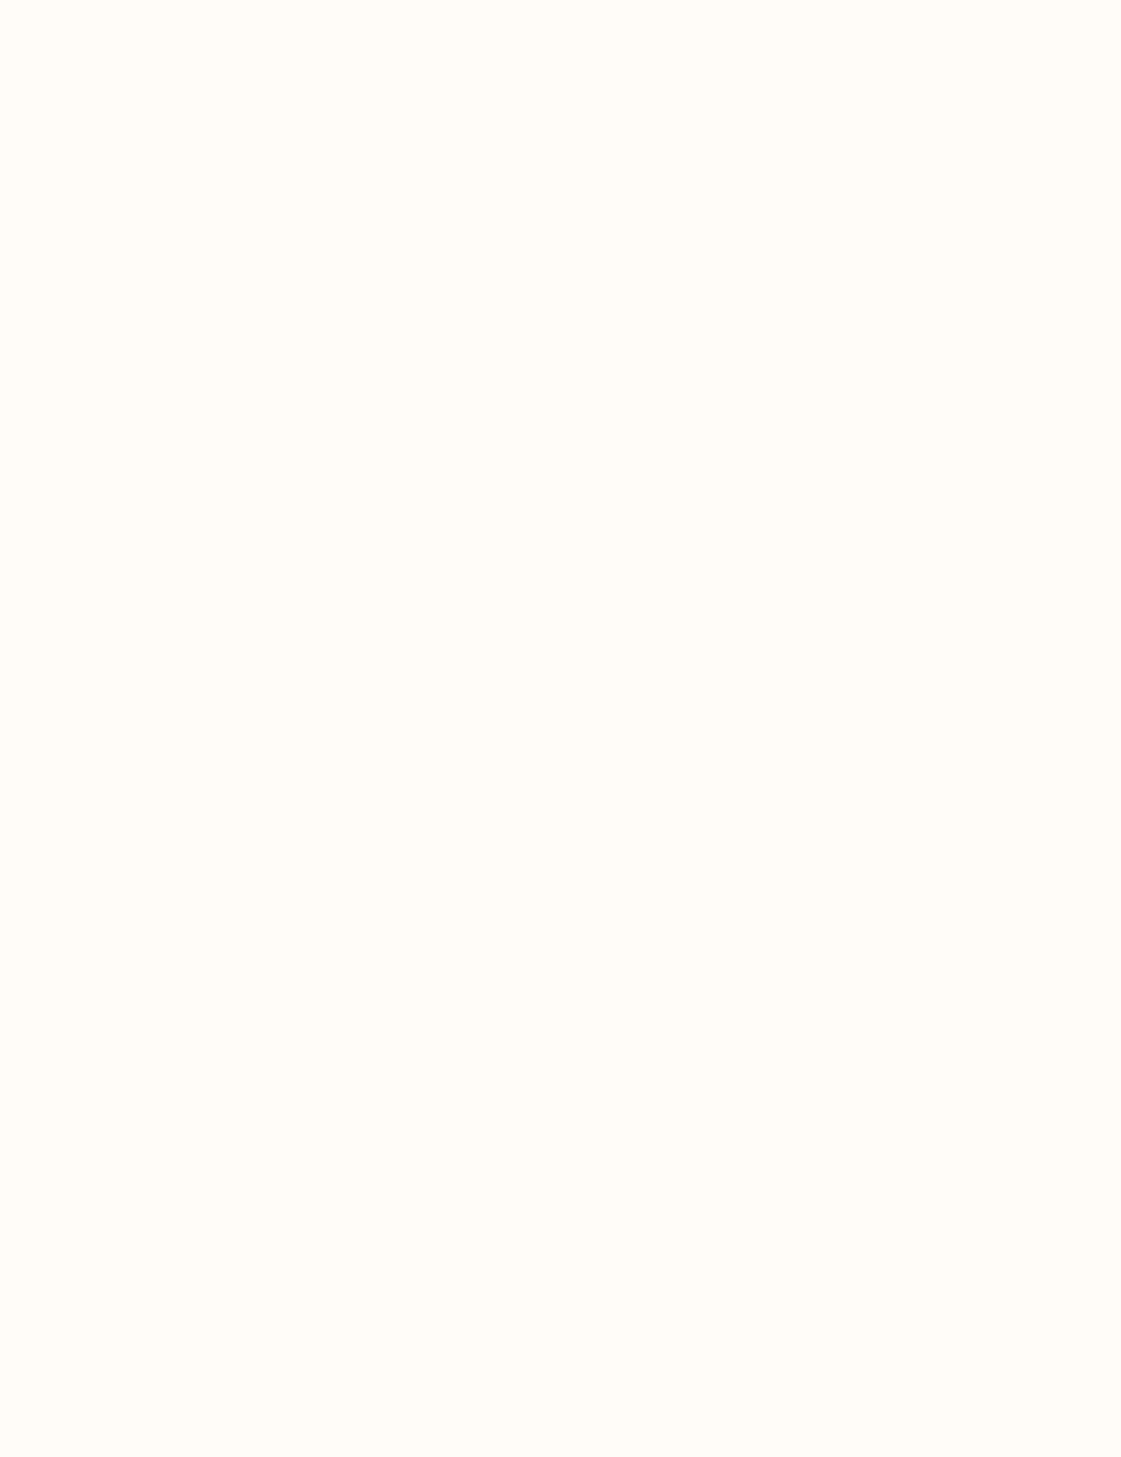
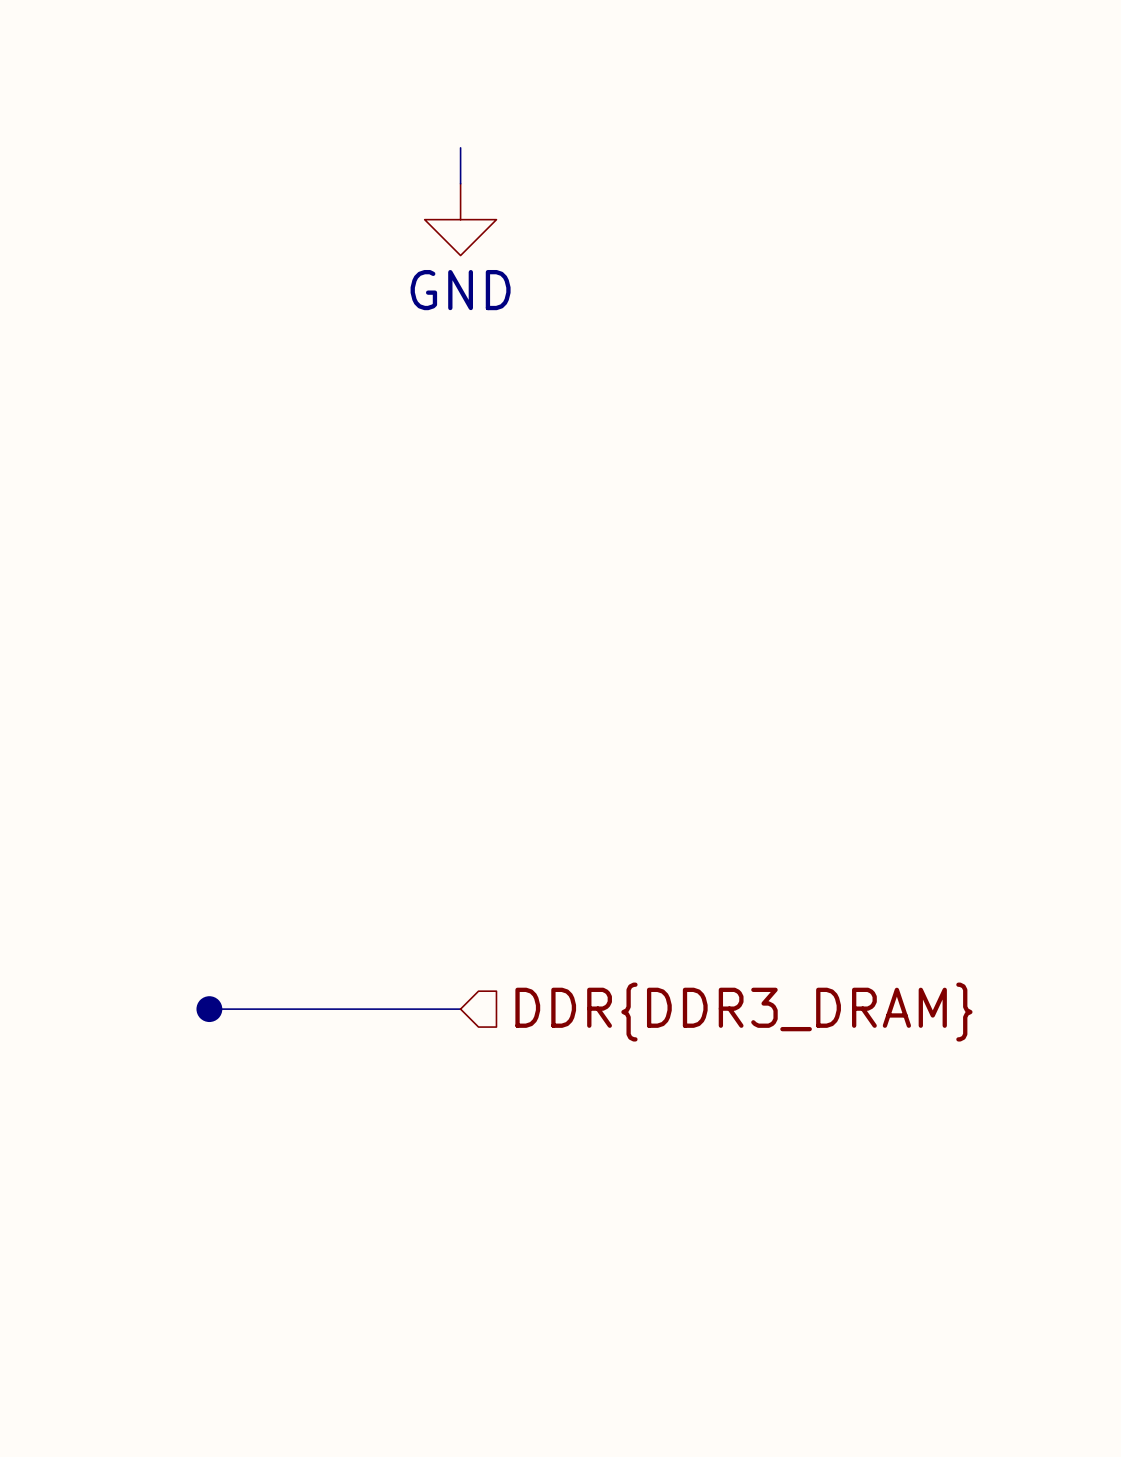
wire: none -> (460, 147) (460, 183)
power symbol: none -> GND (460, 219)
bus: none -> (209, 1009) (460, 1009)
junction: none -> (209, 1009)
hierarchical label: none -> DDR{DDR3_DRAM} (743, 1012)

